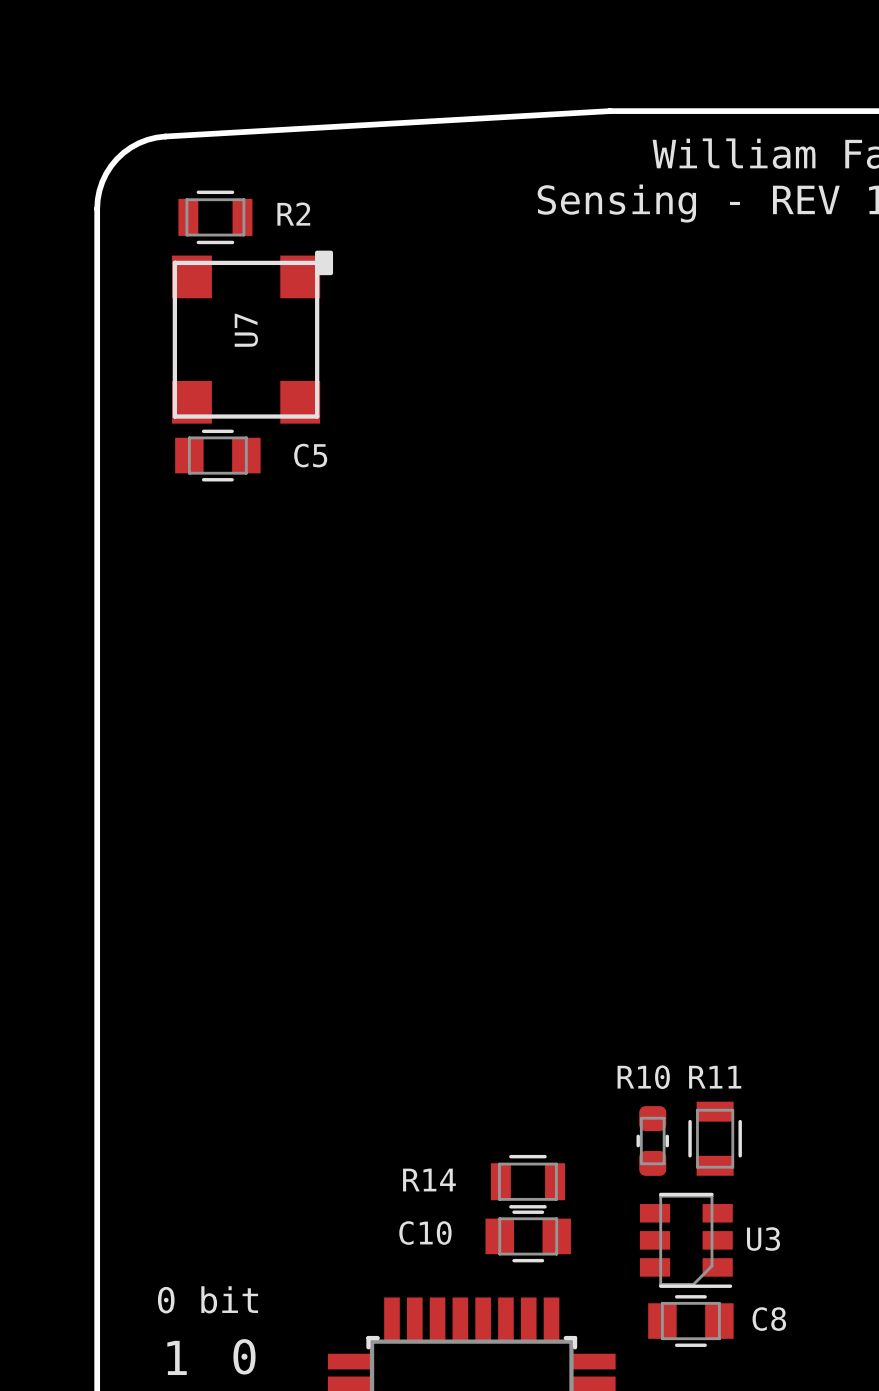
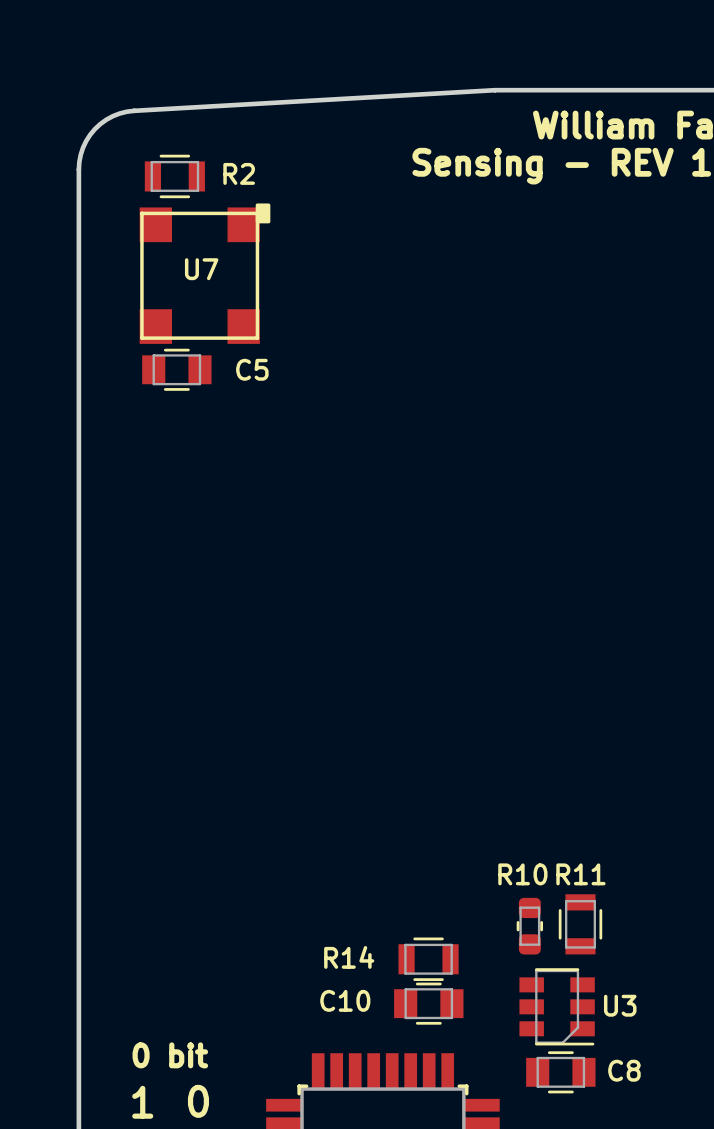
U7 name rotation: 0° (246, 330) -> 90° clockwise (201, 269)

